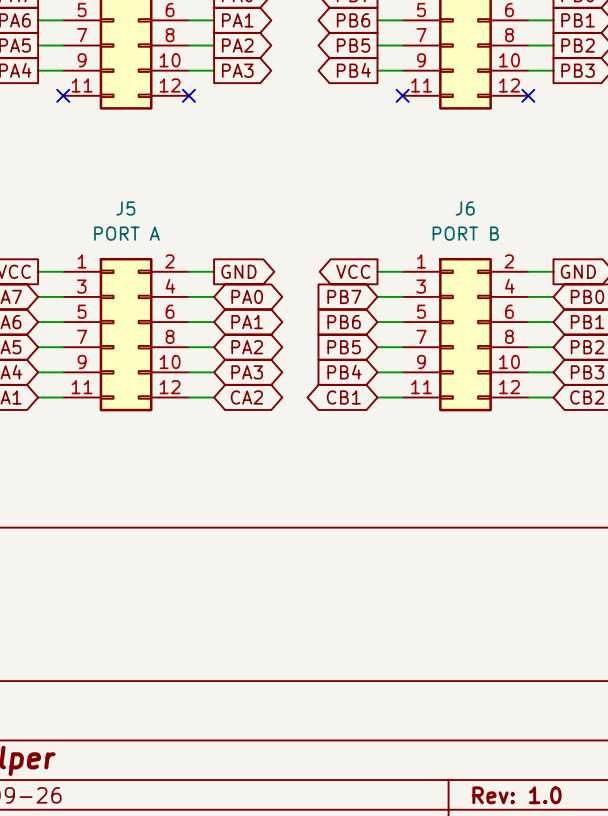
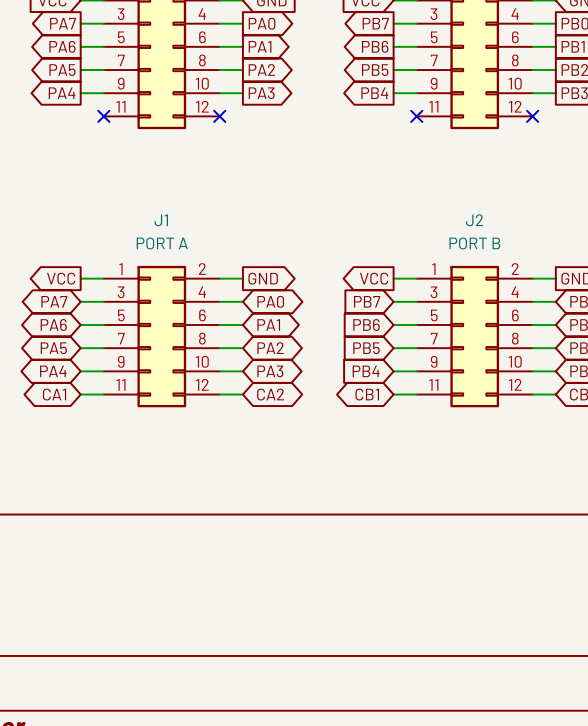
J5 name: J5 (125, 208) -> J1 (161, 220)
J6 name: J6 (465, 208) -> J2 (474, 220)

